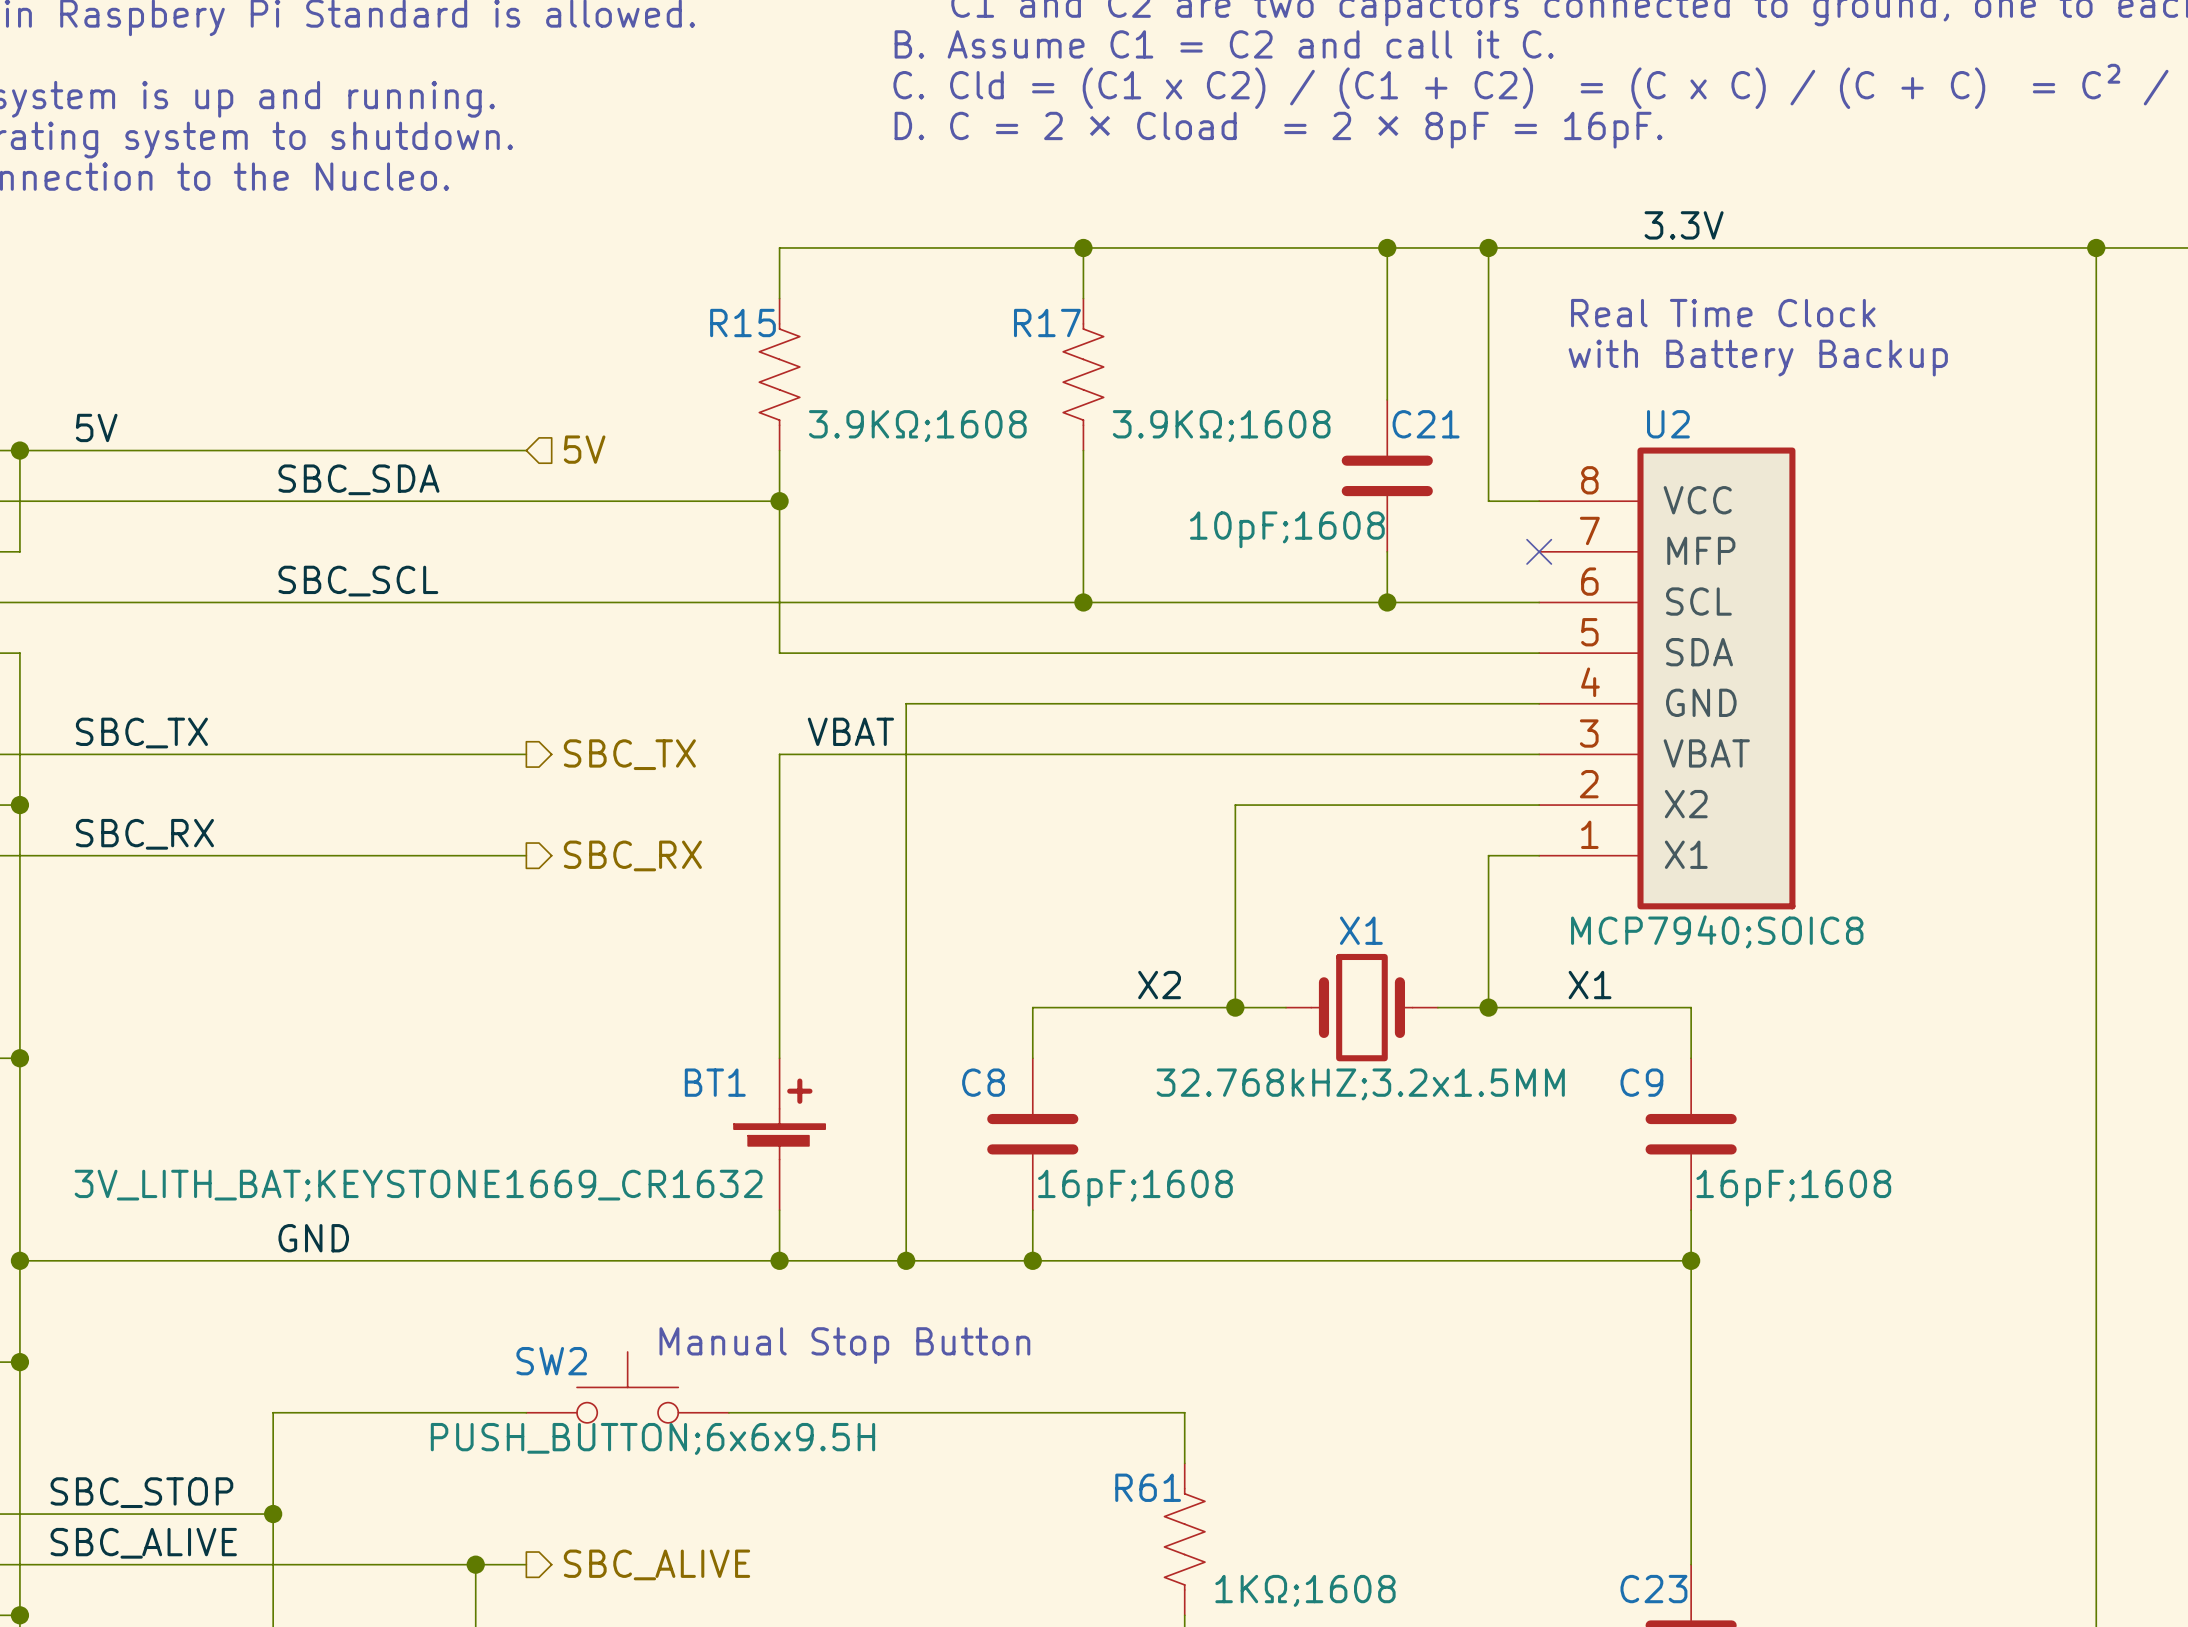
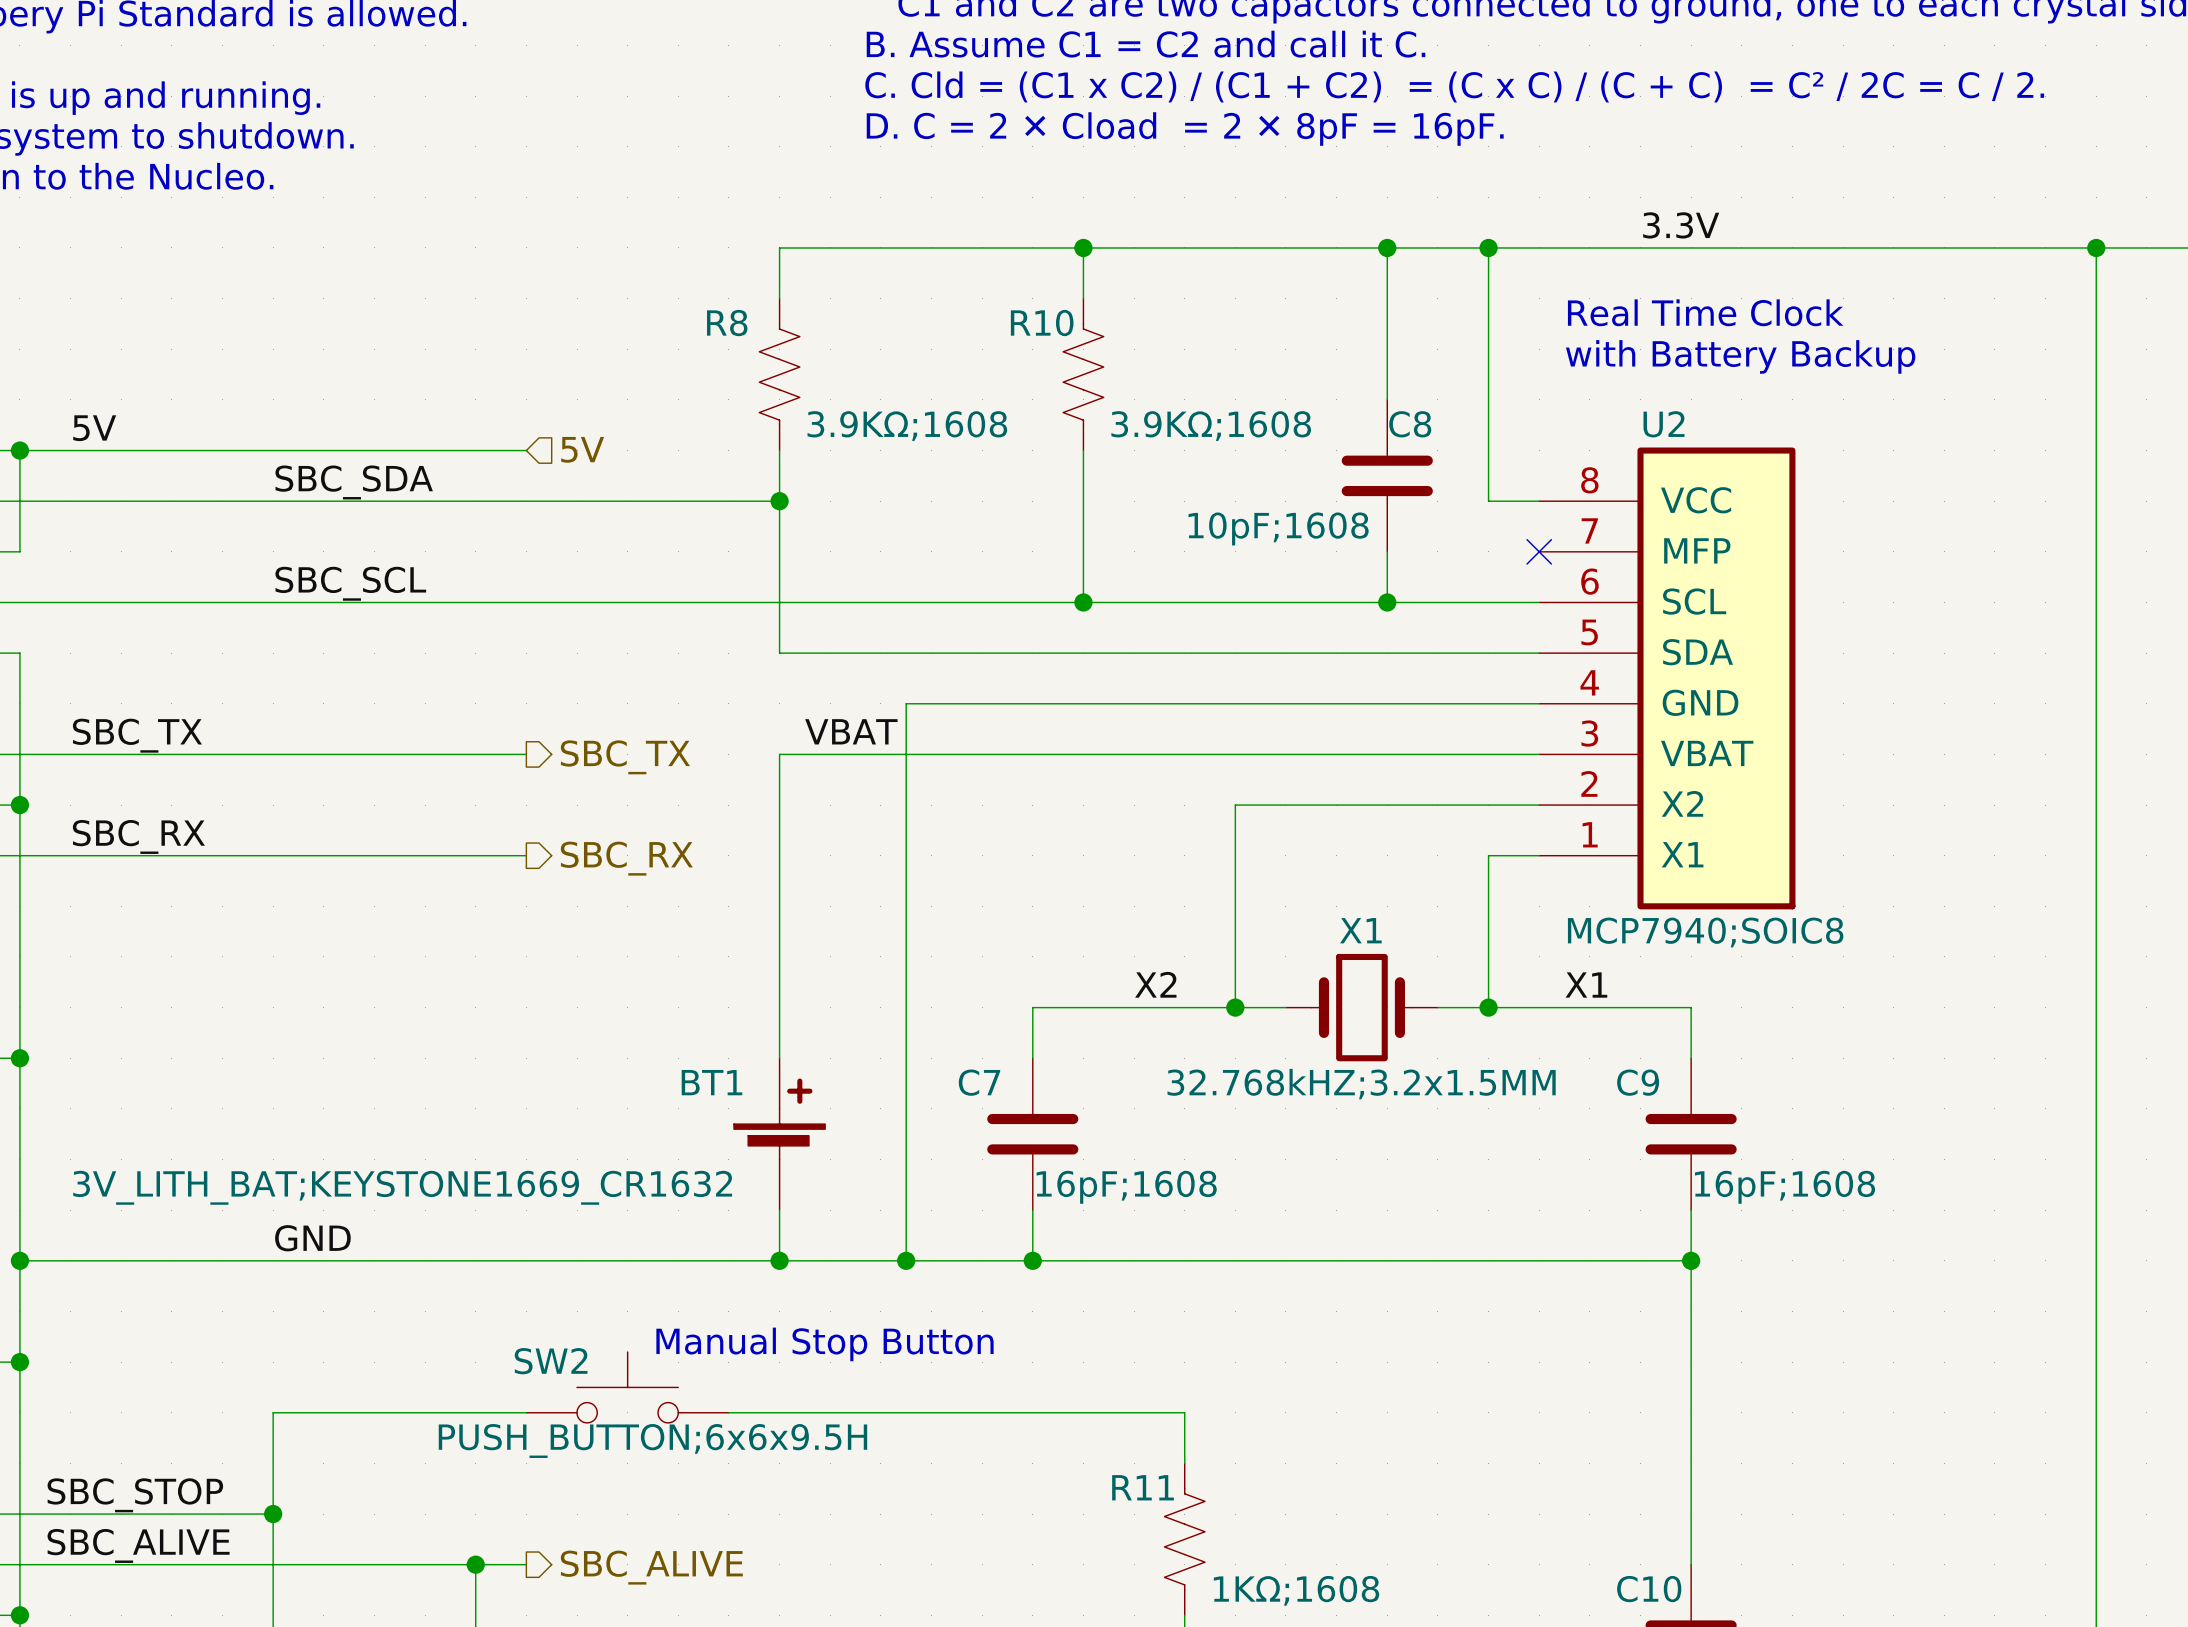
R15 name: R15 (742, 323) -> R8 (727, 323)
R17 name: R17 (1047, 323) -> R10 (1042, 323)
C21 name: C21 (1426, 424) -> C8 (1410, 424)
C8 name: C8 (983, 1082) -> C7 (979, 1082)
R61 name: R61 (1148, 1487) -> R11 (1143, 1487)
C23 name: C23 (1653, 1589) -> C10 (1649, 1589)

